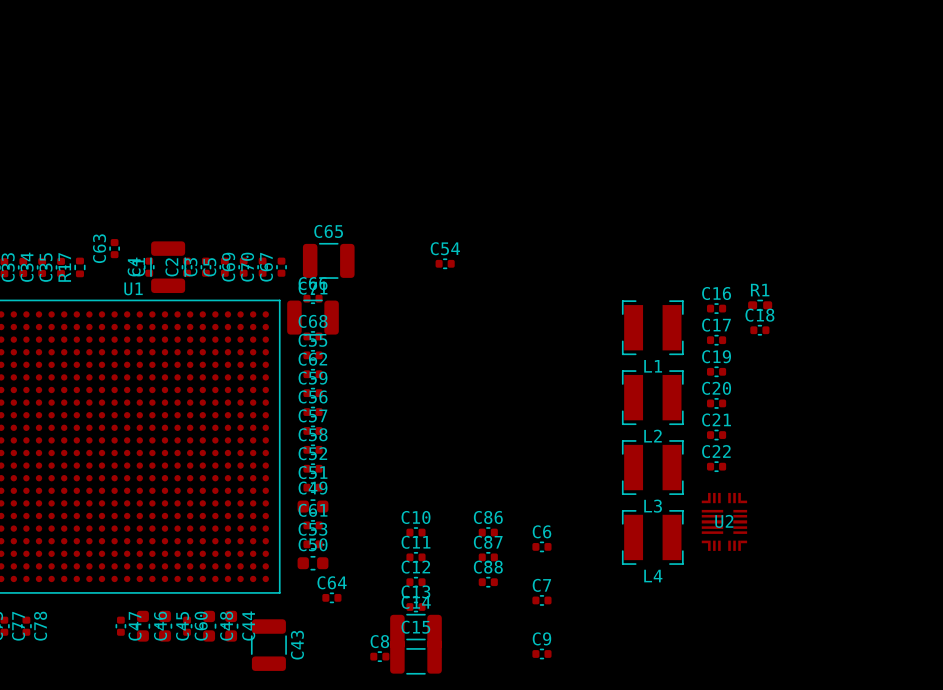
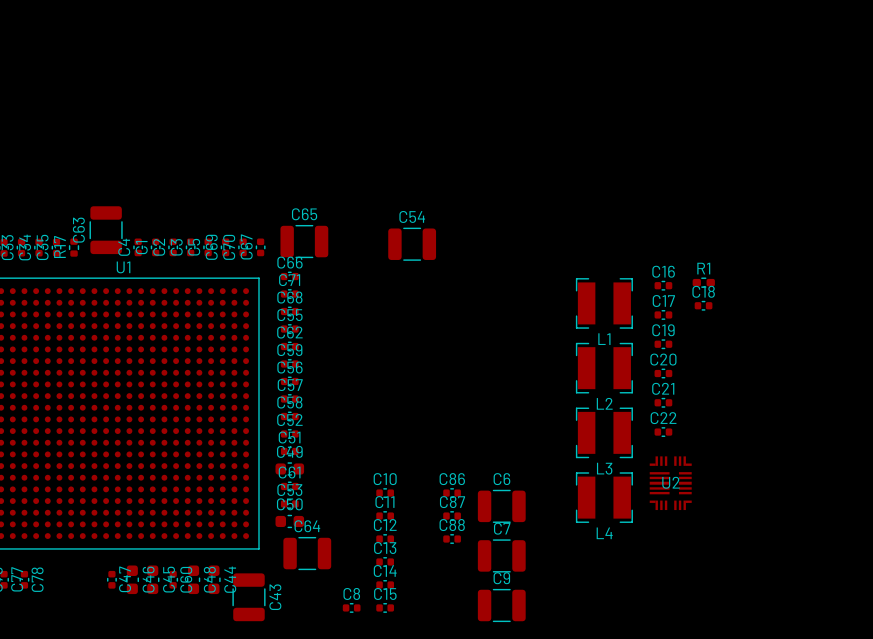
C63 footprint: [109, 239, 120, 259] -> [89, 206, 123, 255]
C1 footprint: [150, 241, 187, 294] -> [150, 238, 161, 257]
C54 footprint: [435, 258, 455, 270] -> [388, 227, 437, 261]
C71 footprint: [287, 299, 339, 336] -> [280, 289, 299, 299]
C6 footprint: [532, 541, 552, 553] -> [477, 489, 526, 523]
C64 footprint: [322, 592, 342, 604] -> [283, 536, 332, 571]
C7 footprint: [532, 595, 552, 606] -> [477, 539, 526, 573]
C14 footprint: [390, 613, 442, 650] -> [376, 580, 395, 590]
C15 footprint: [390, 638, 442, 675] -> [376, 603, 395, 613]
C9 footprint: [532, 648, 552, 660] -> [477, 588, 526, 623]

